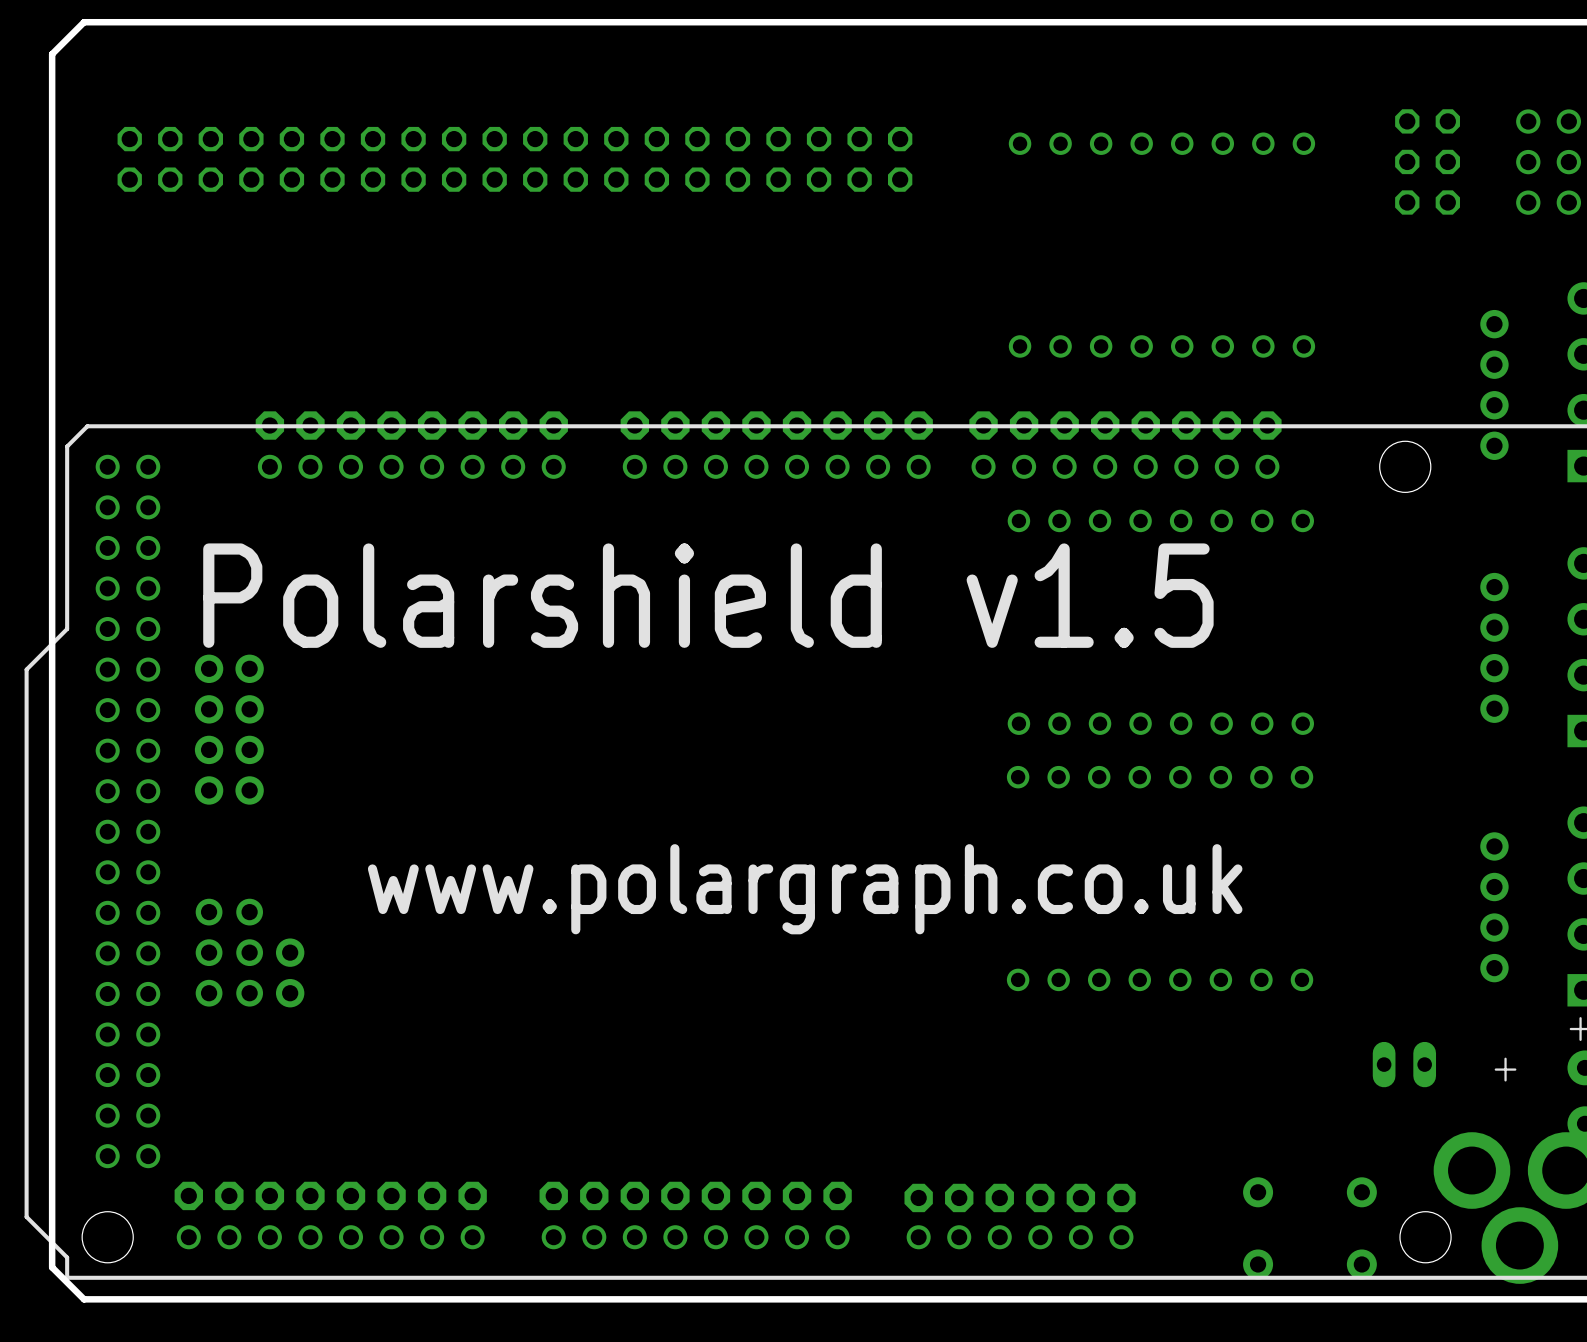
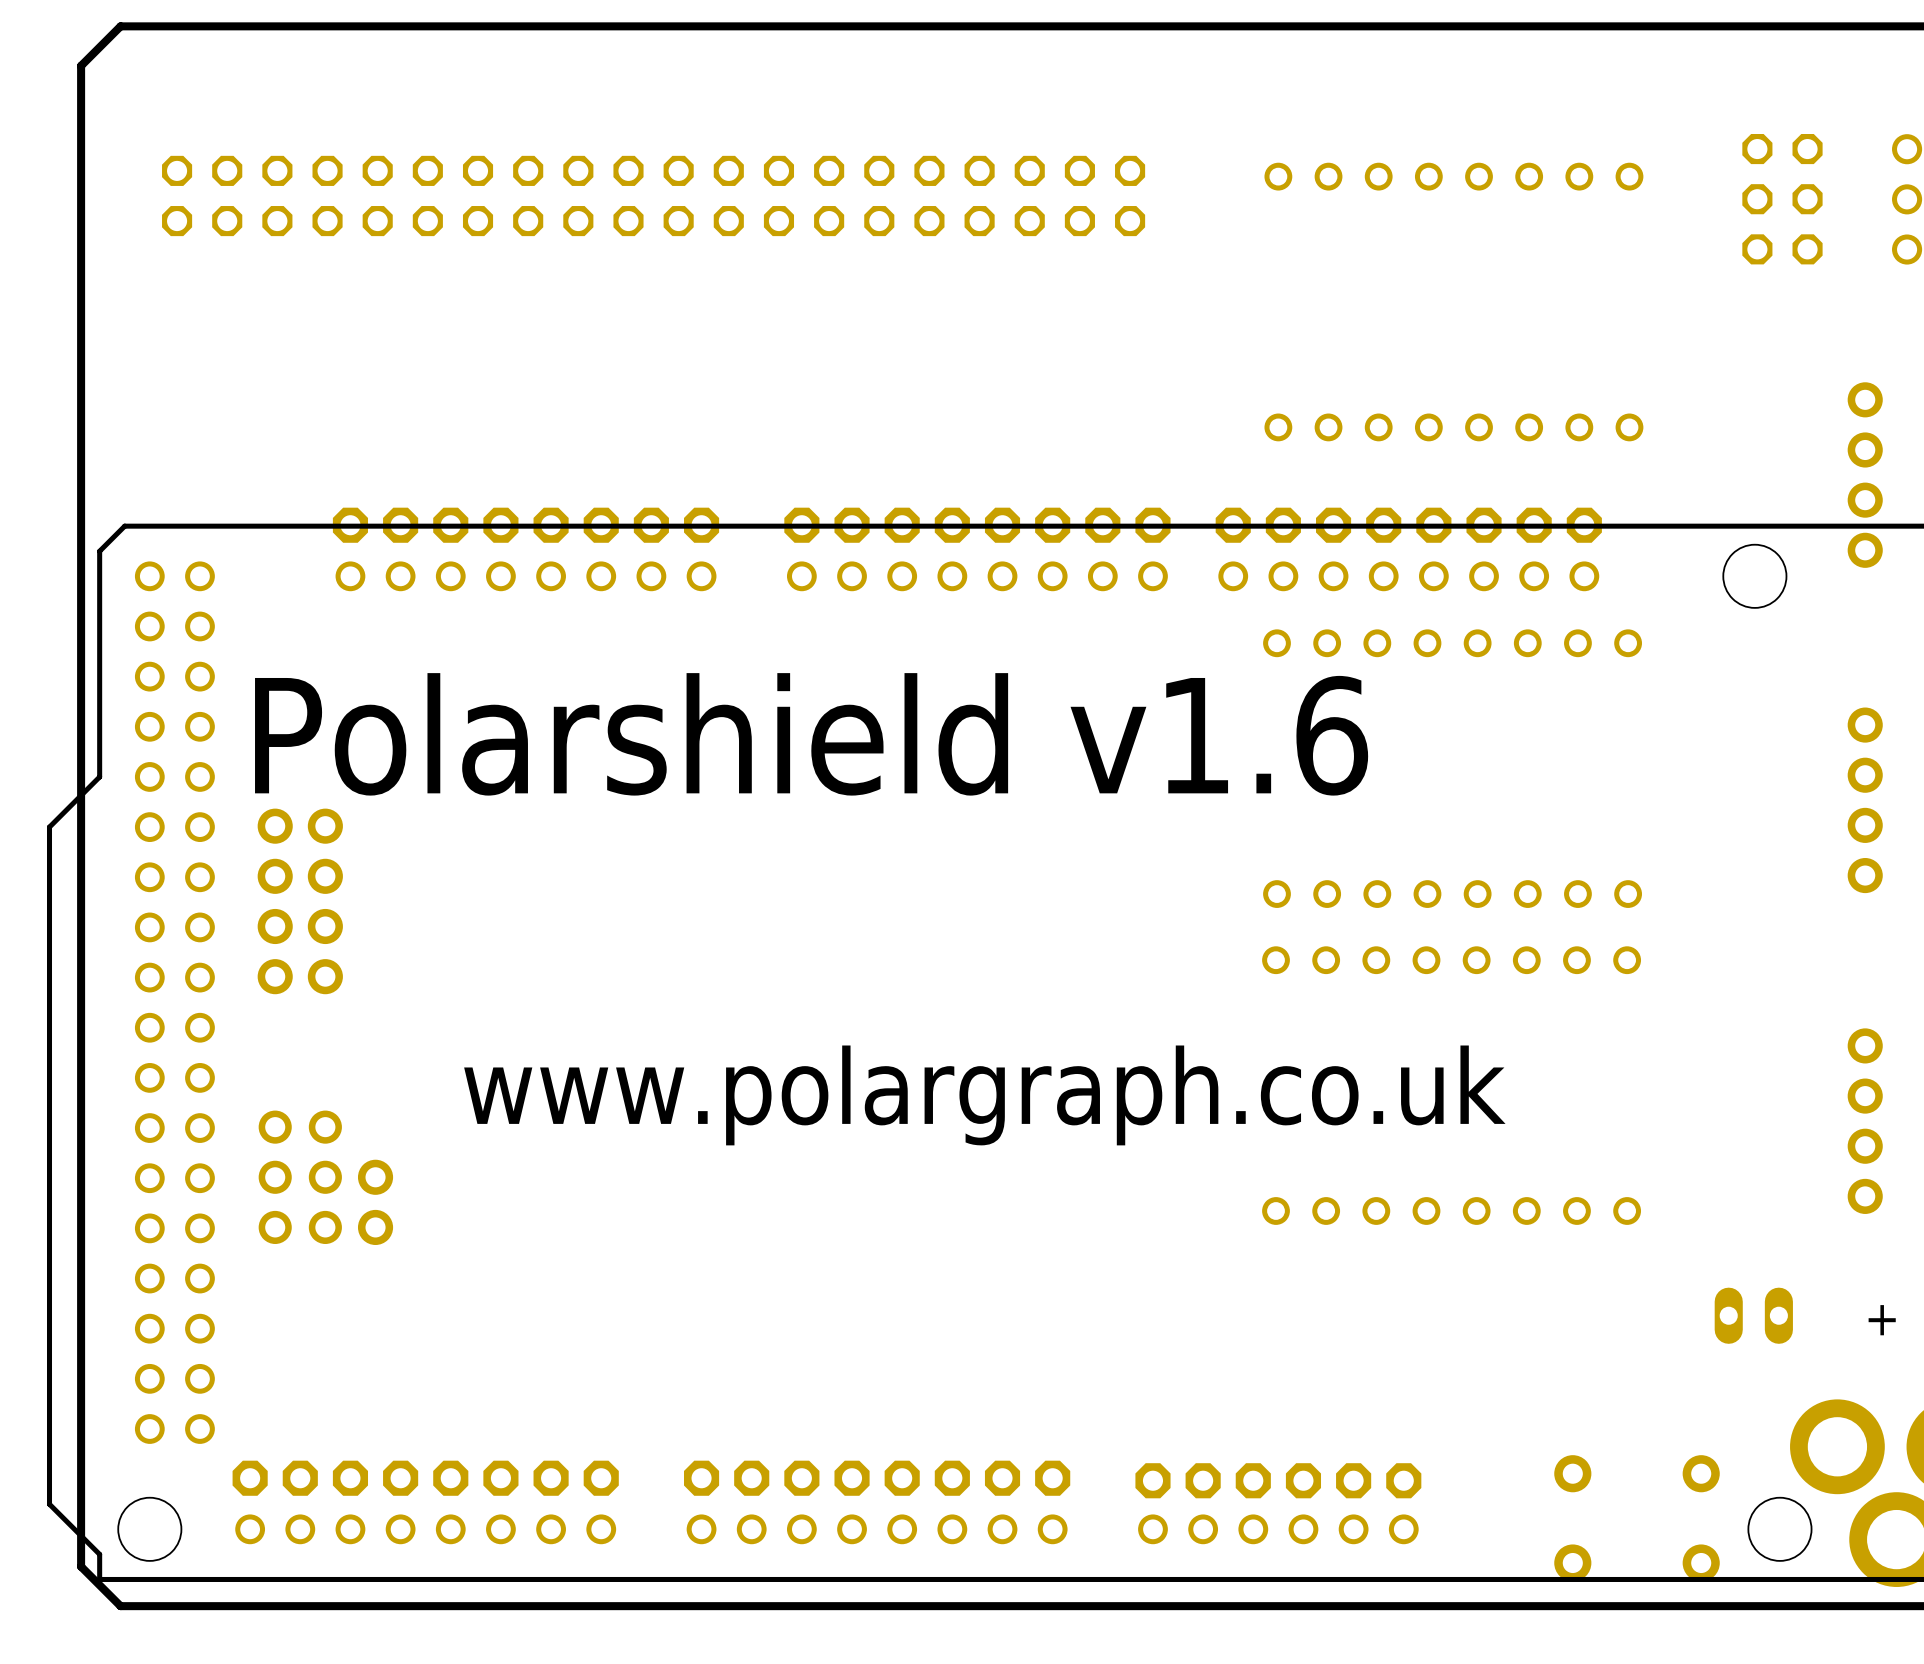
text: Polarshield v1.5 (708, 595) -> Polarshield v1.6 (811, 734)

